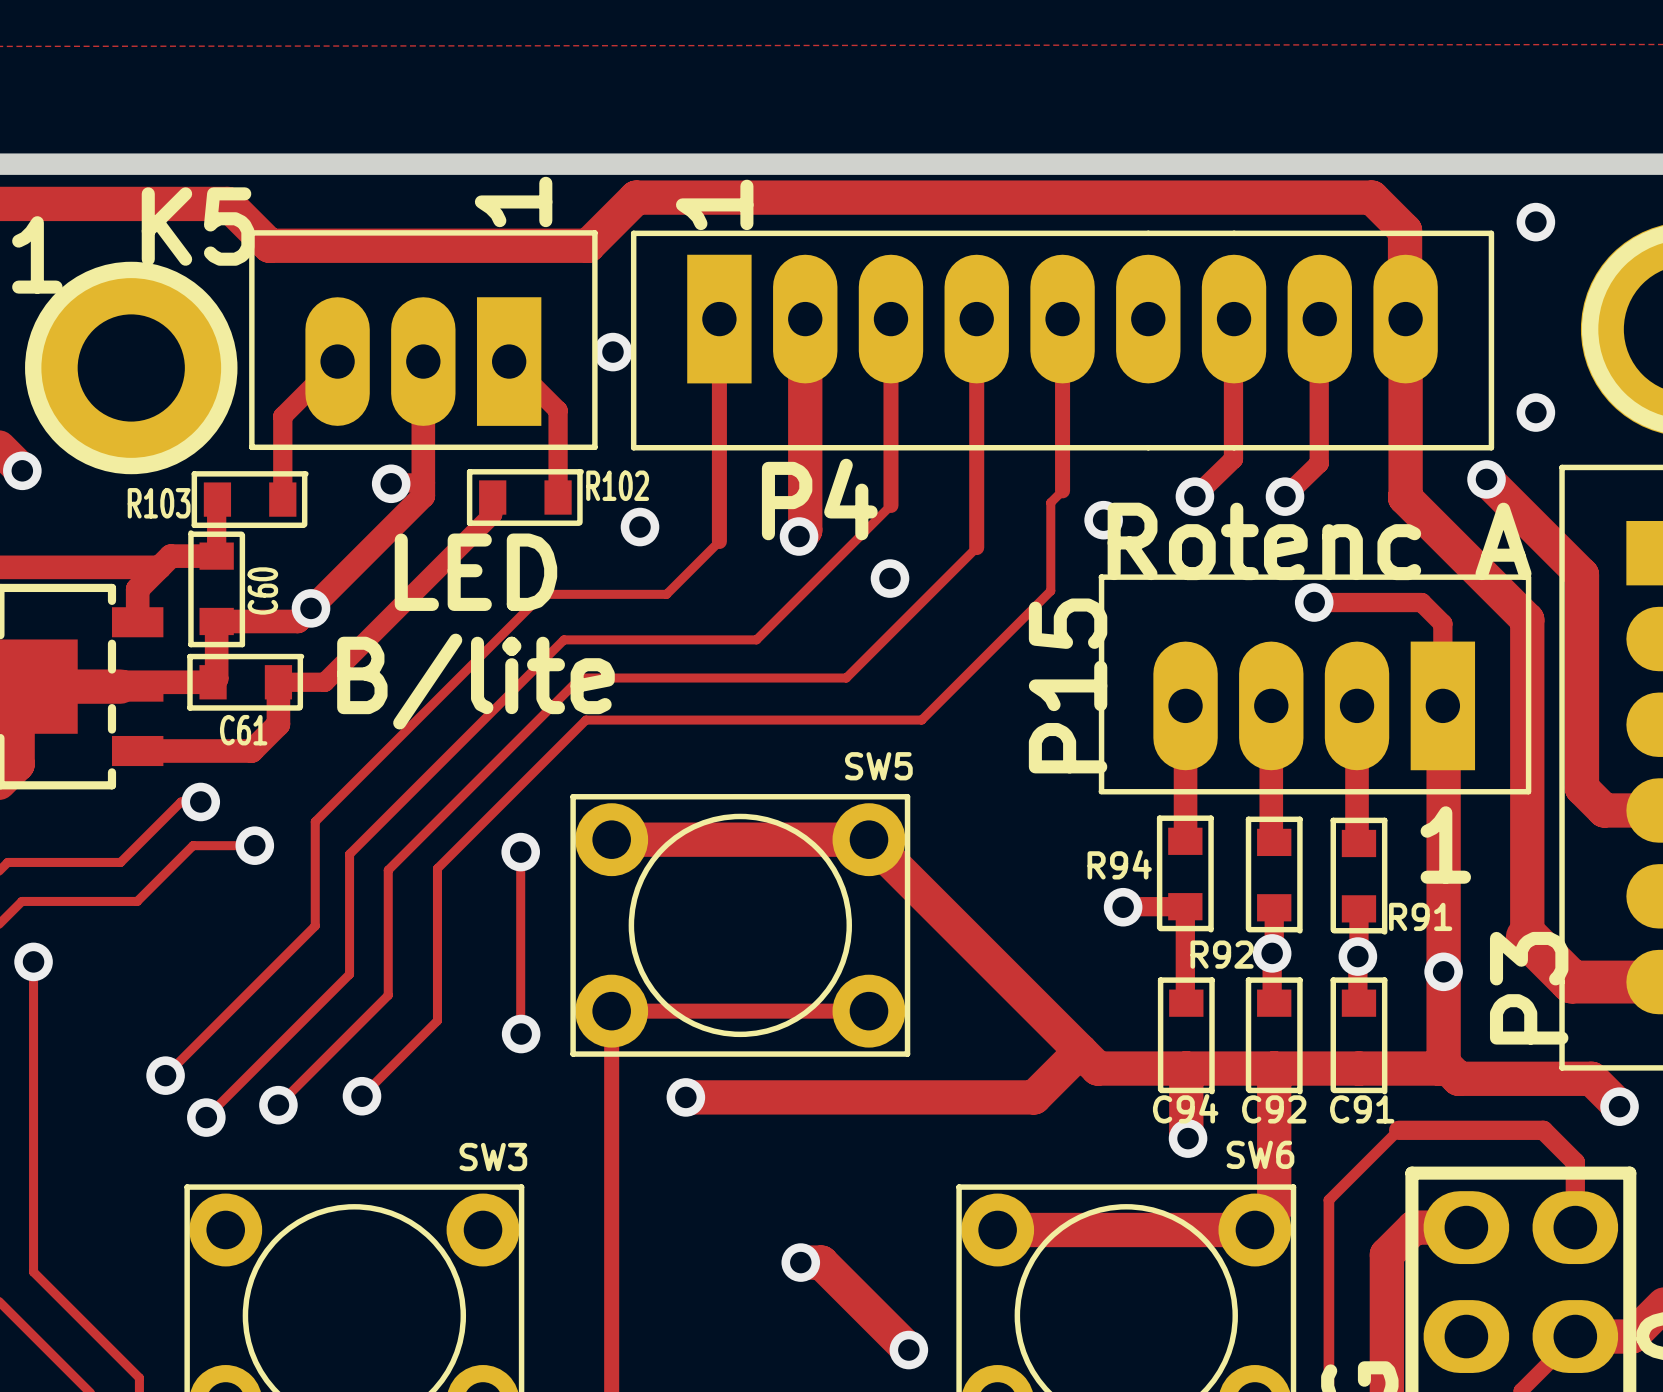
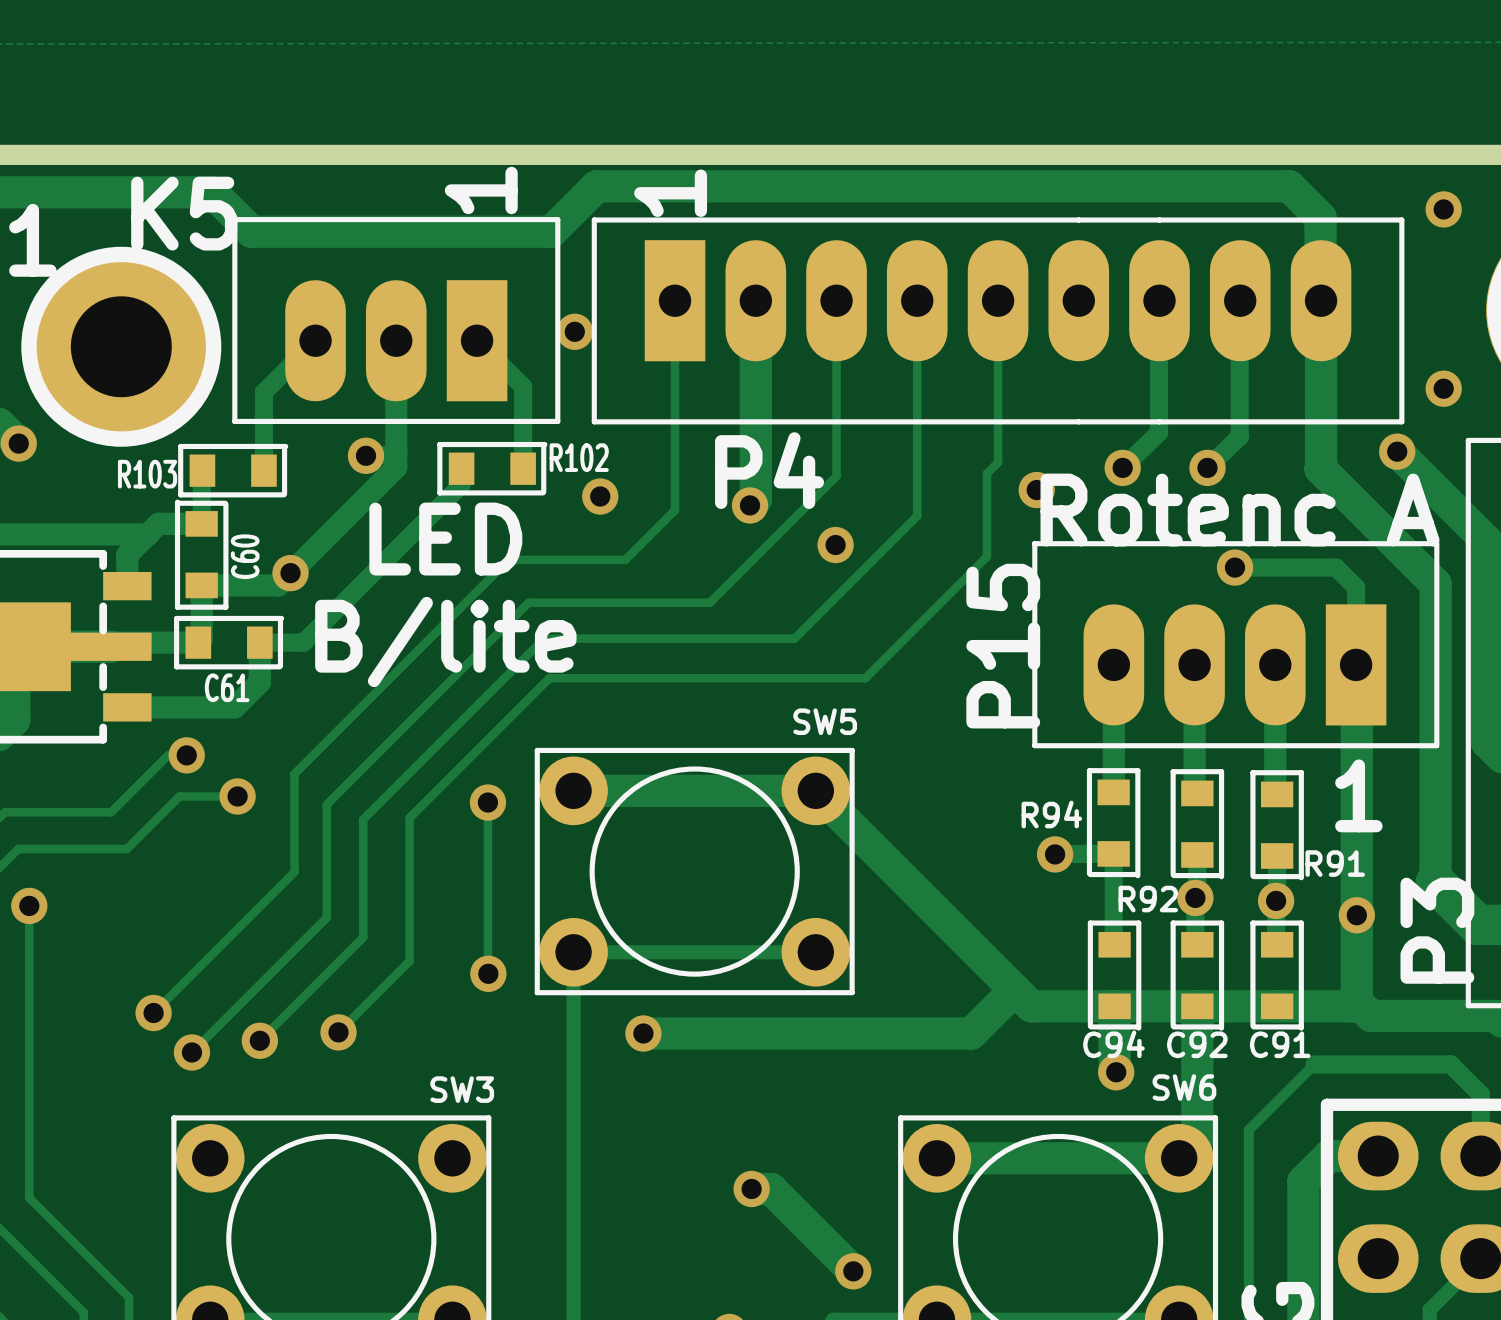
track width: thick (719, 319) (719, 541) -> thin (675, 300) (675, 510)
track width: thick (890, 319) (890, 505) -> thin (836, 300) (836, 476)
track width: thick (976, 319) (976, 547) -> thin (917, 300) (917, 515)
track width: thick (1062, 319) (1062, 490) -> thin (998, 300) (998, 462)

